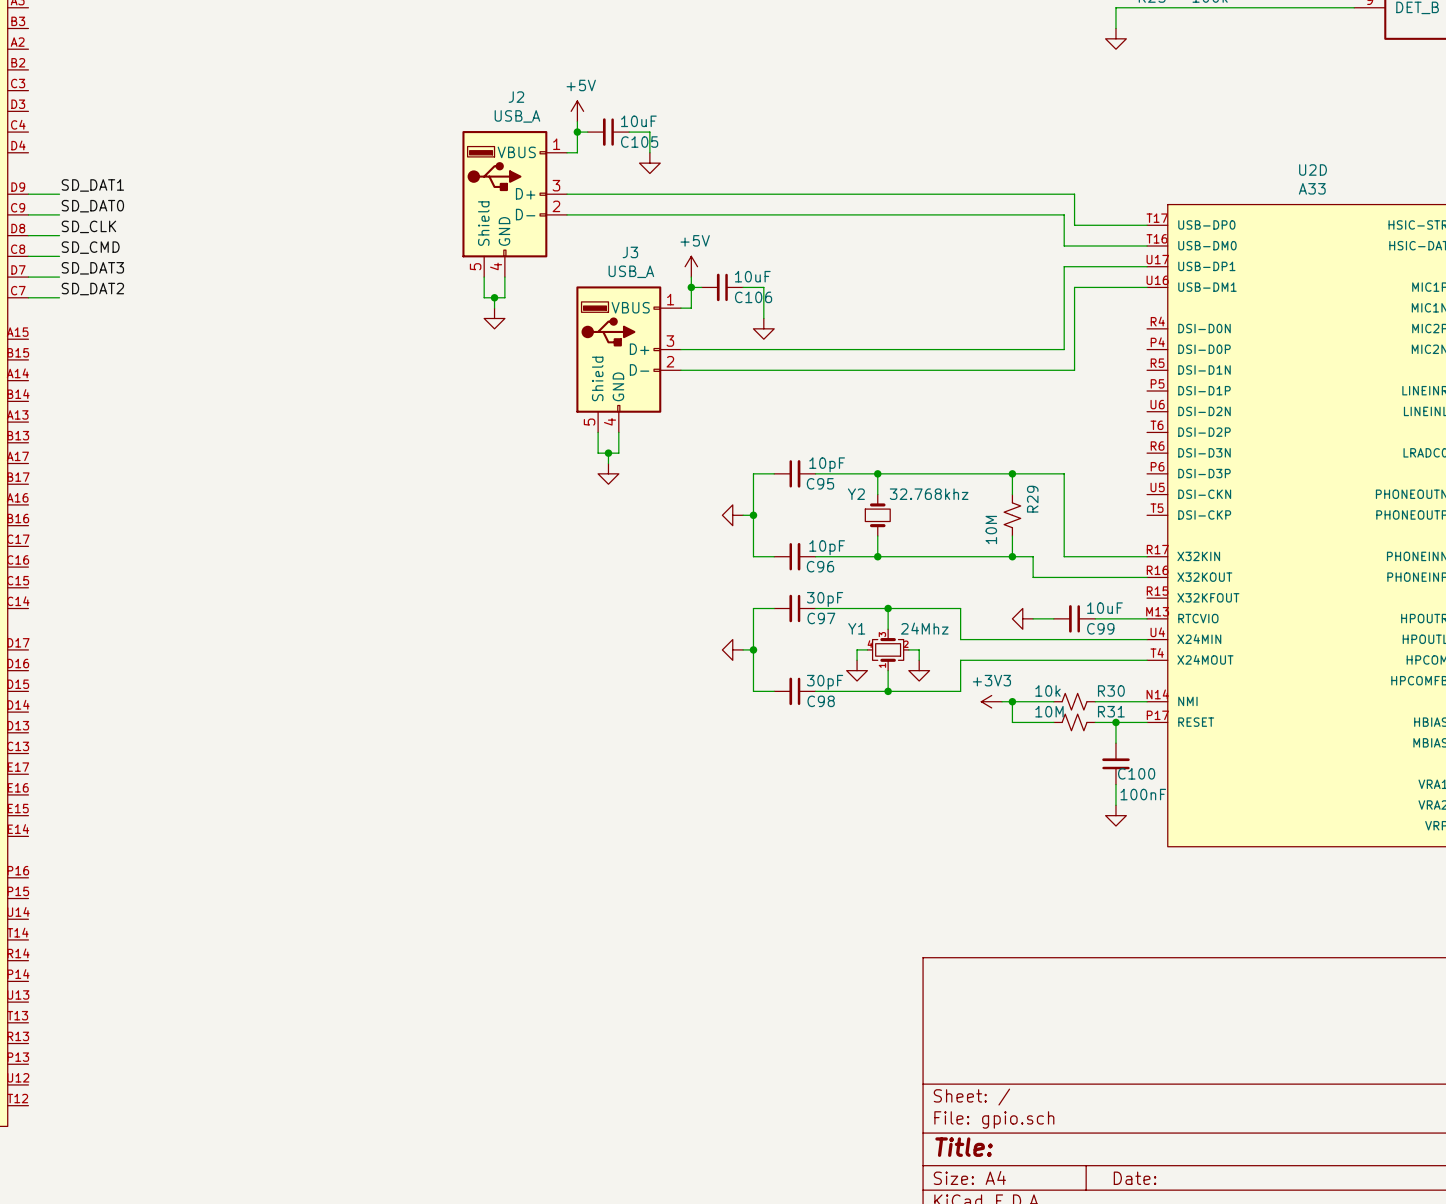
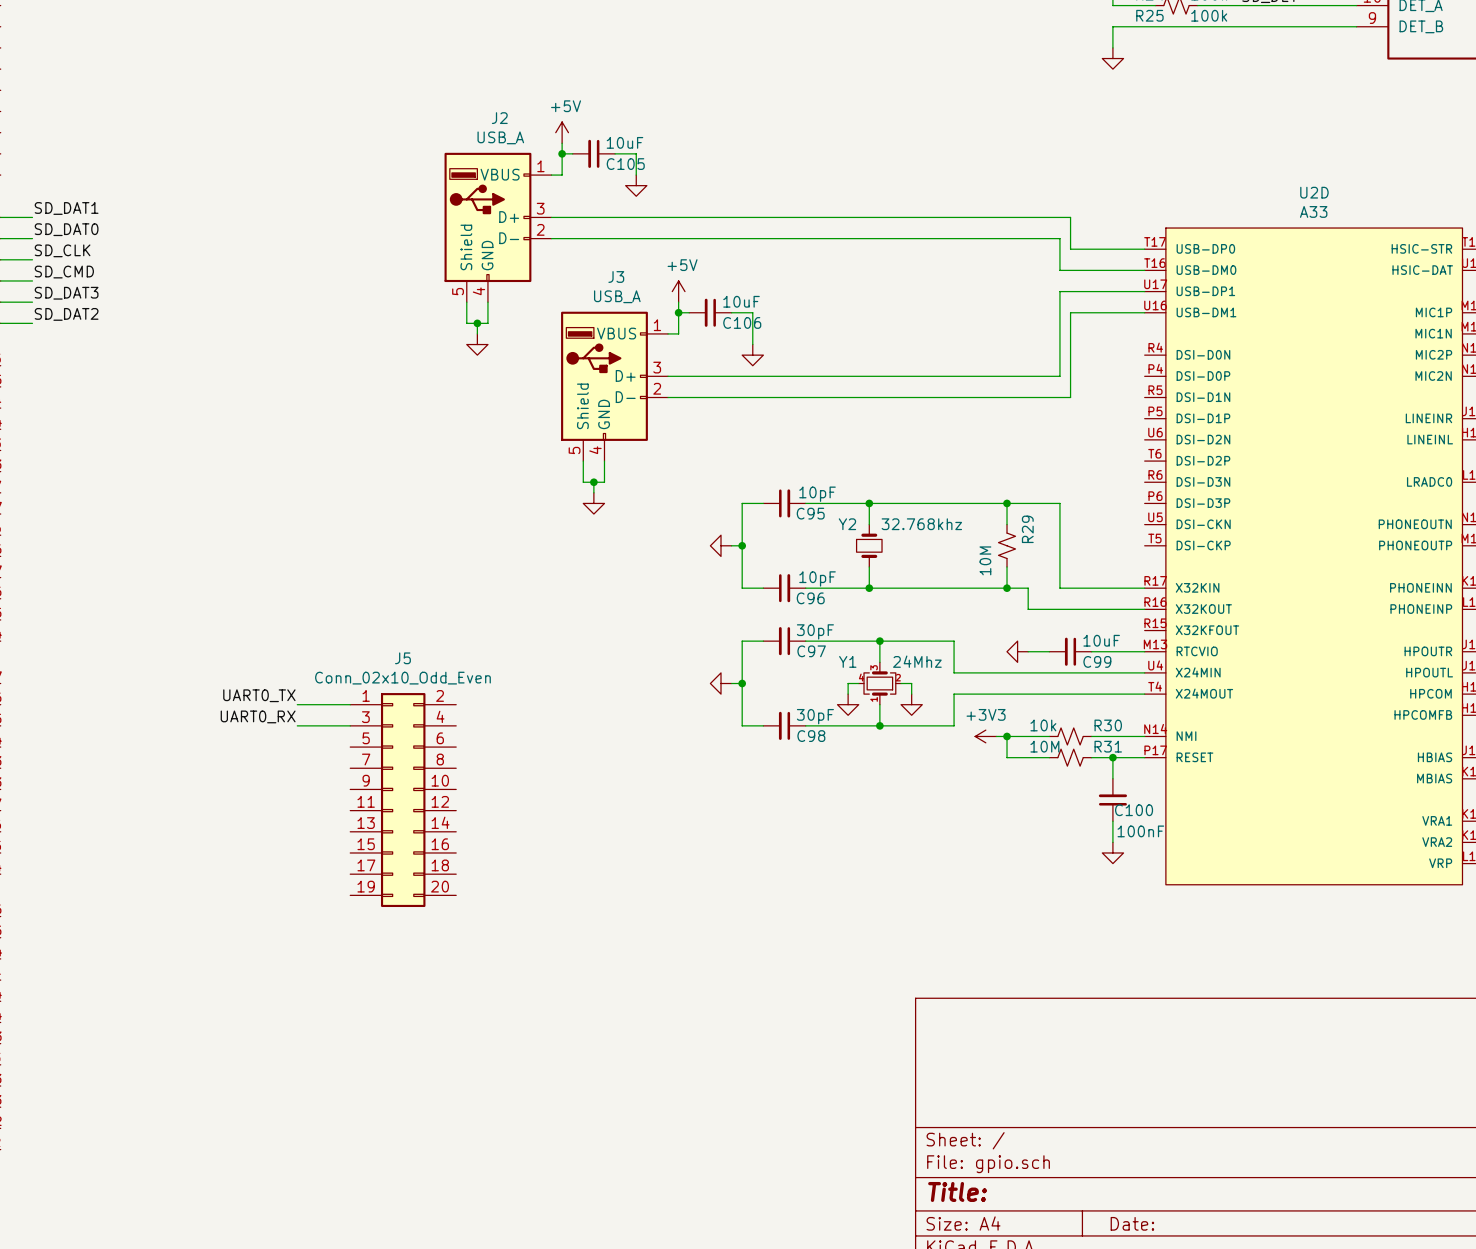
label: none -> UART0_TX (259, 695)
wire: none -> (297, 704) (350, 704)
label: none -> UART0_RX (258, 716)
wire: none -> (297, 725) (350, 725)
J5: none -> Conn_02x10_Odd_Even (403, 800)

